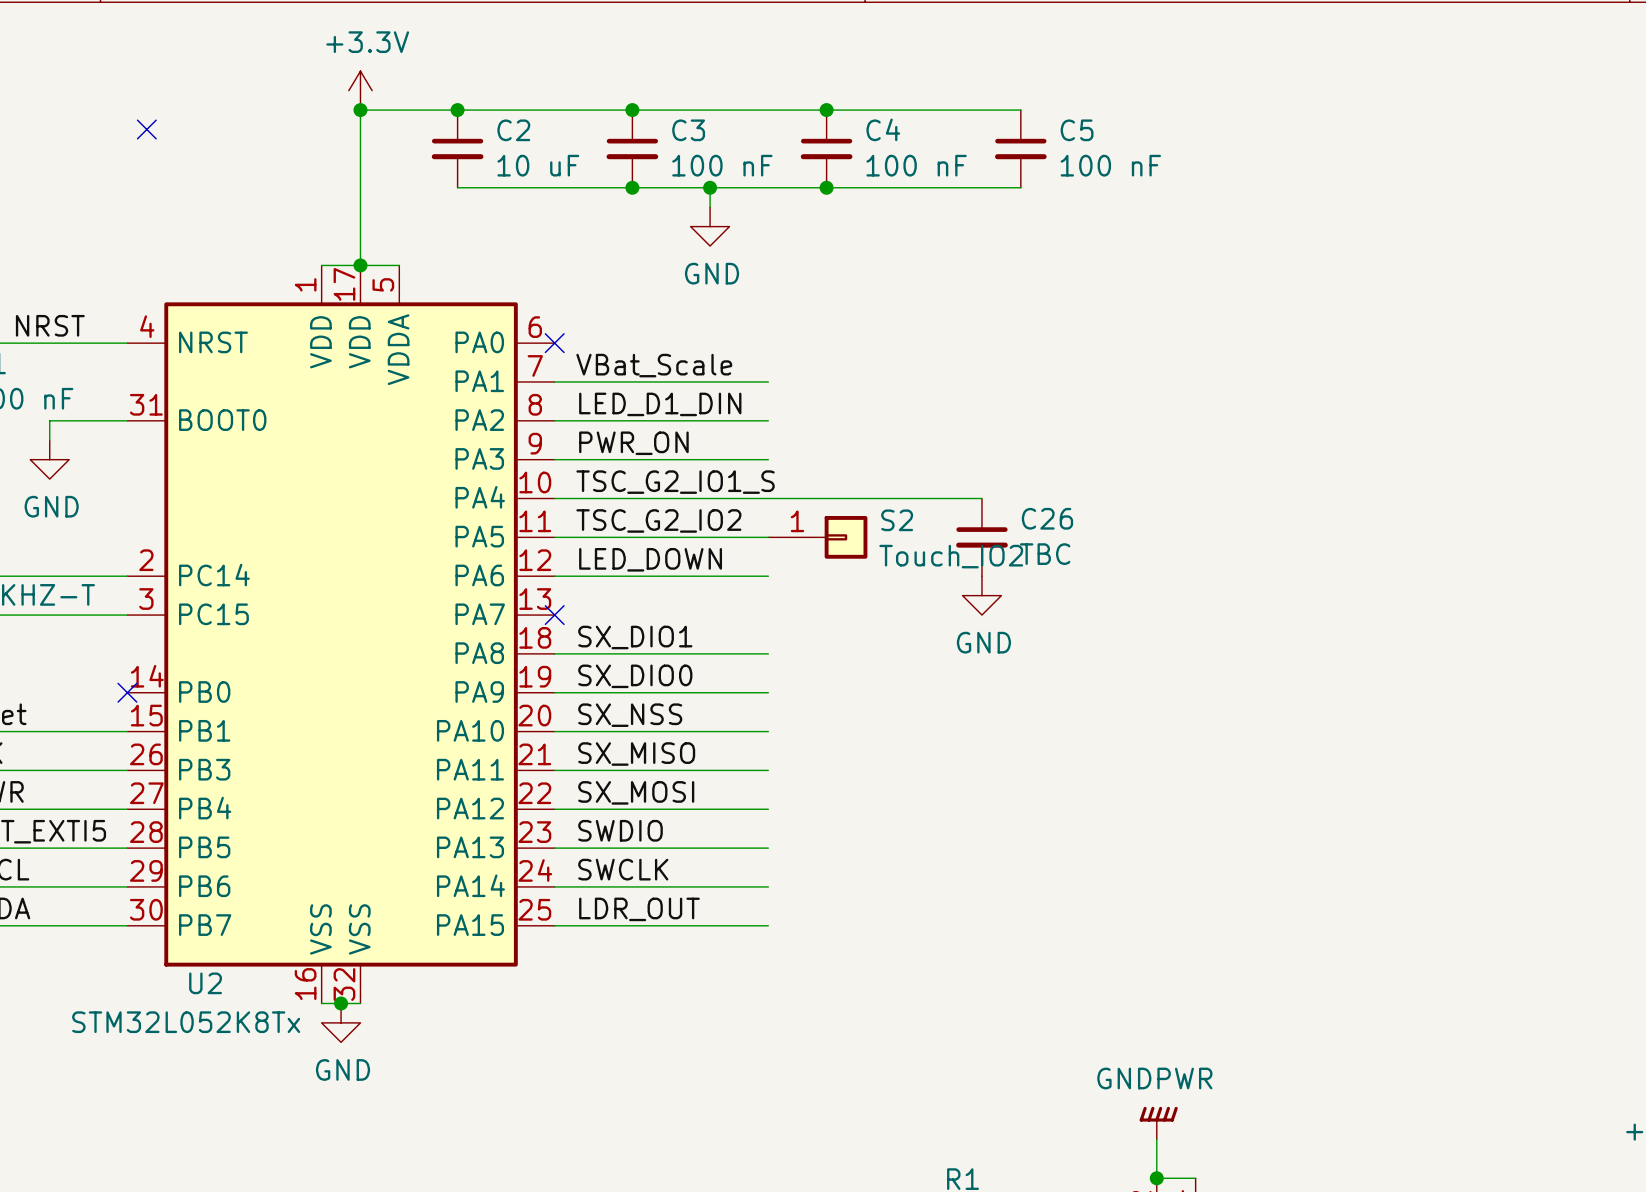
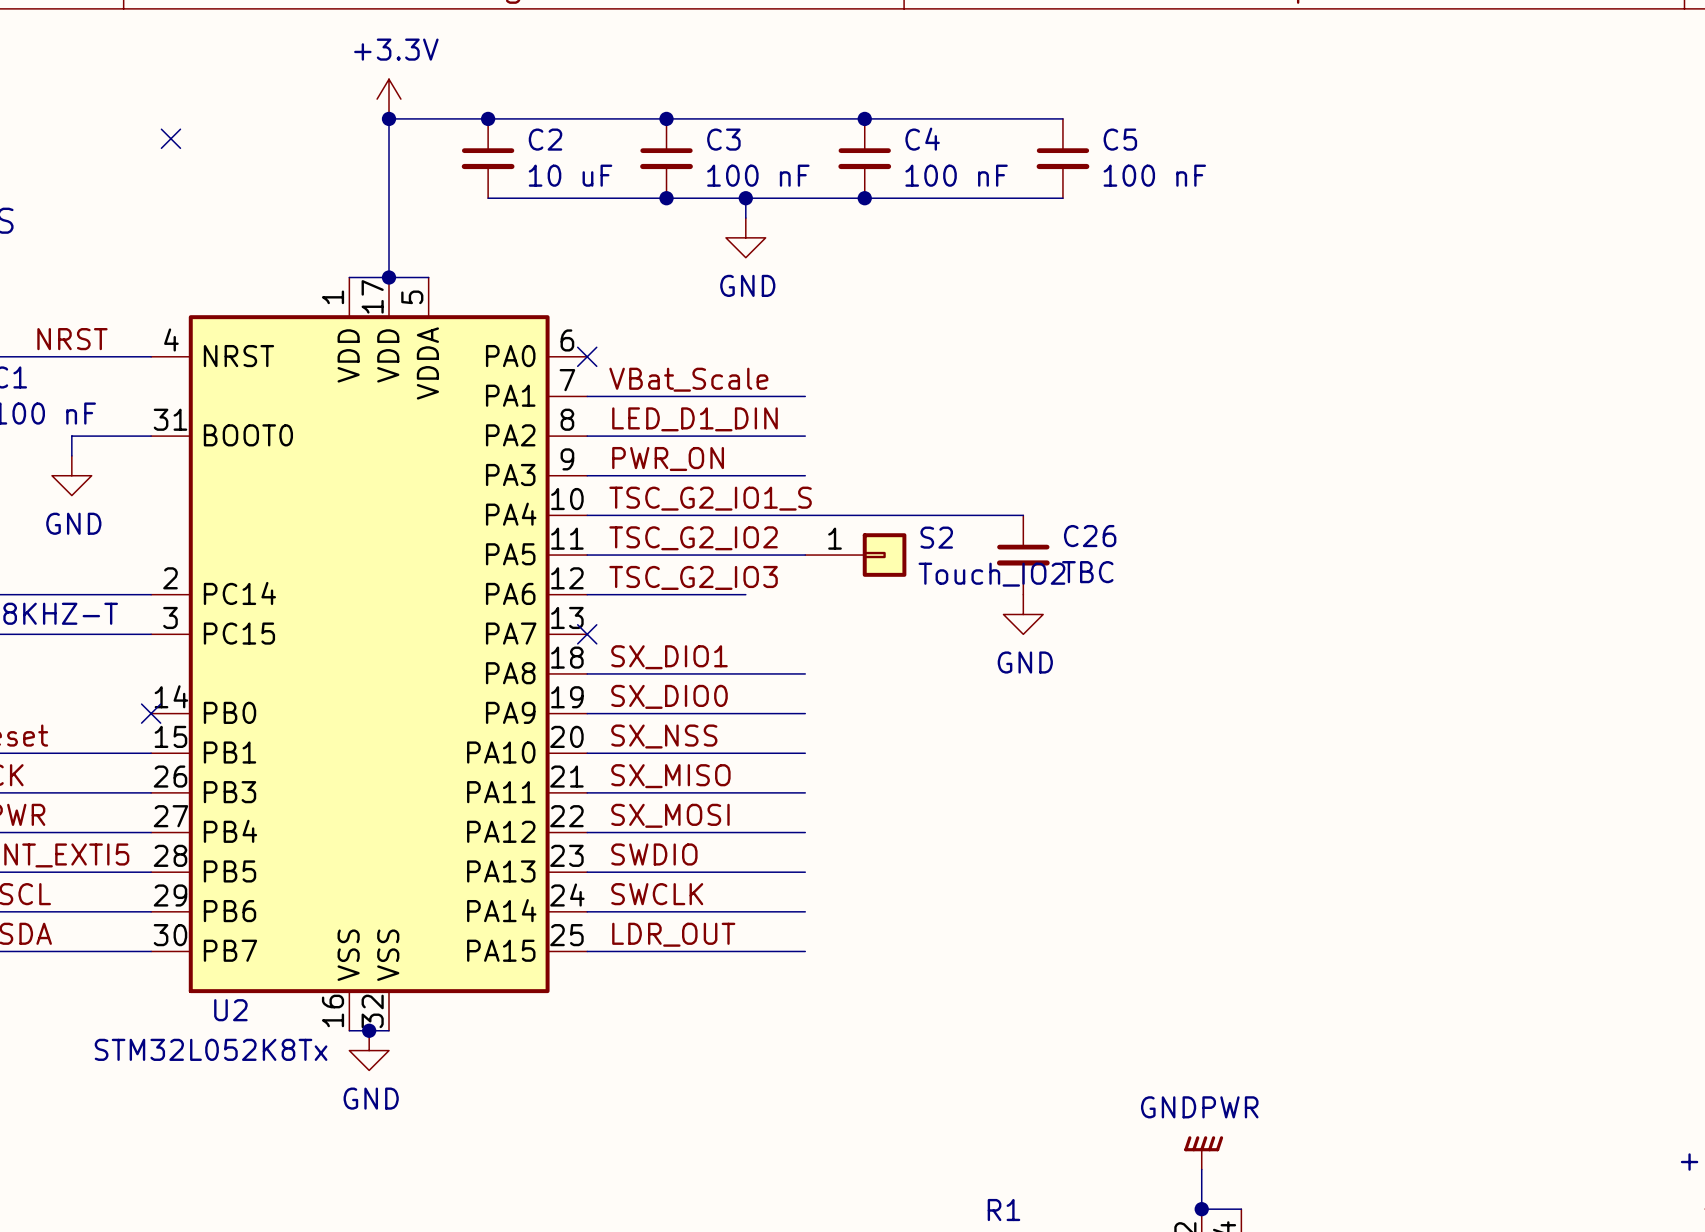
label: LED_DOWN (650, 559) -> TSC_G2_IO3 (693, 577)
wire: (710, 576) (768, 576) -> none

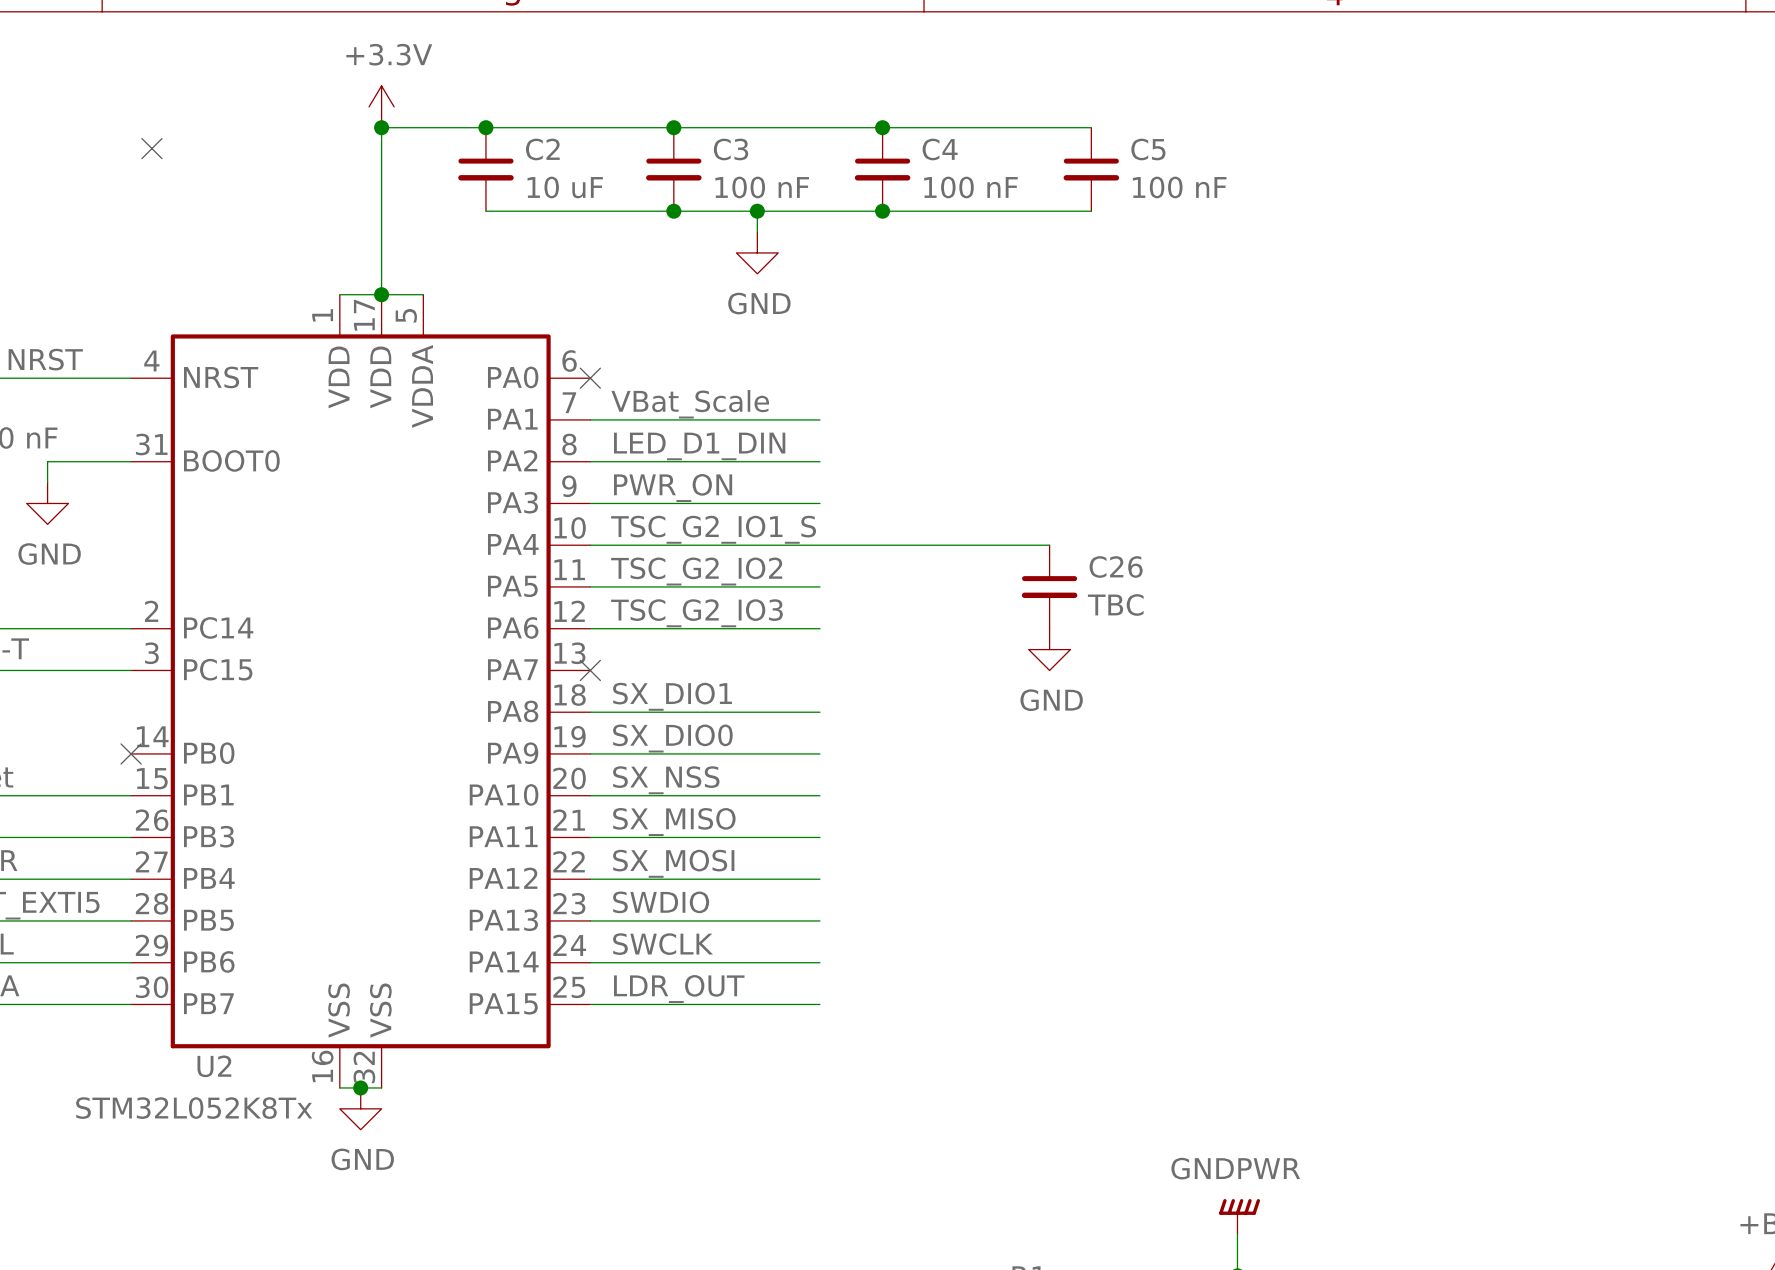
S2: Touch_IO2 (855, 555) -> none
wire: none -> (757, 628) (819, 628)

